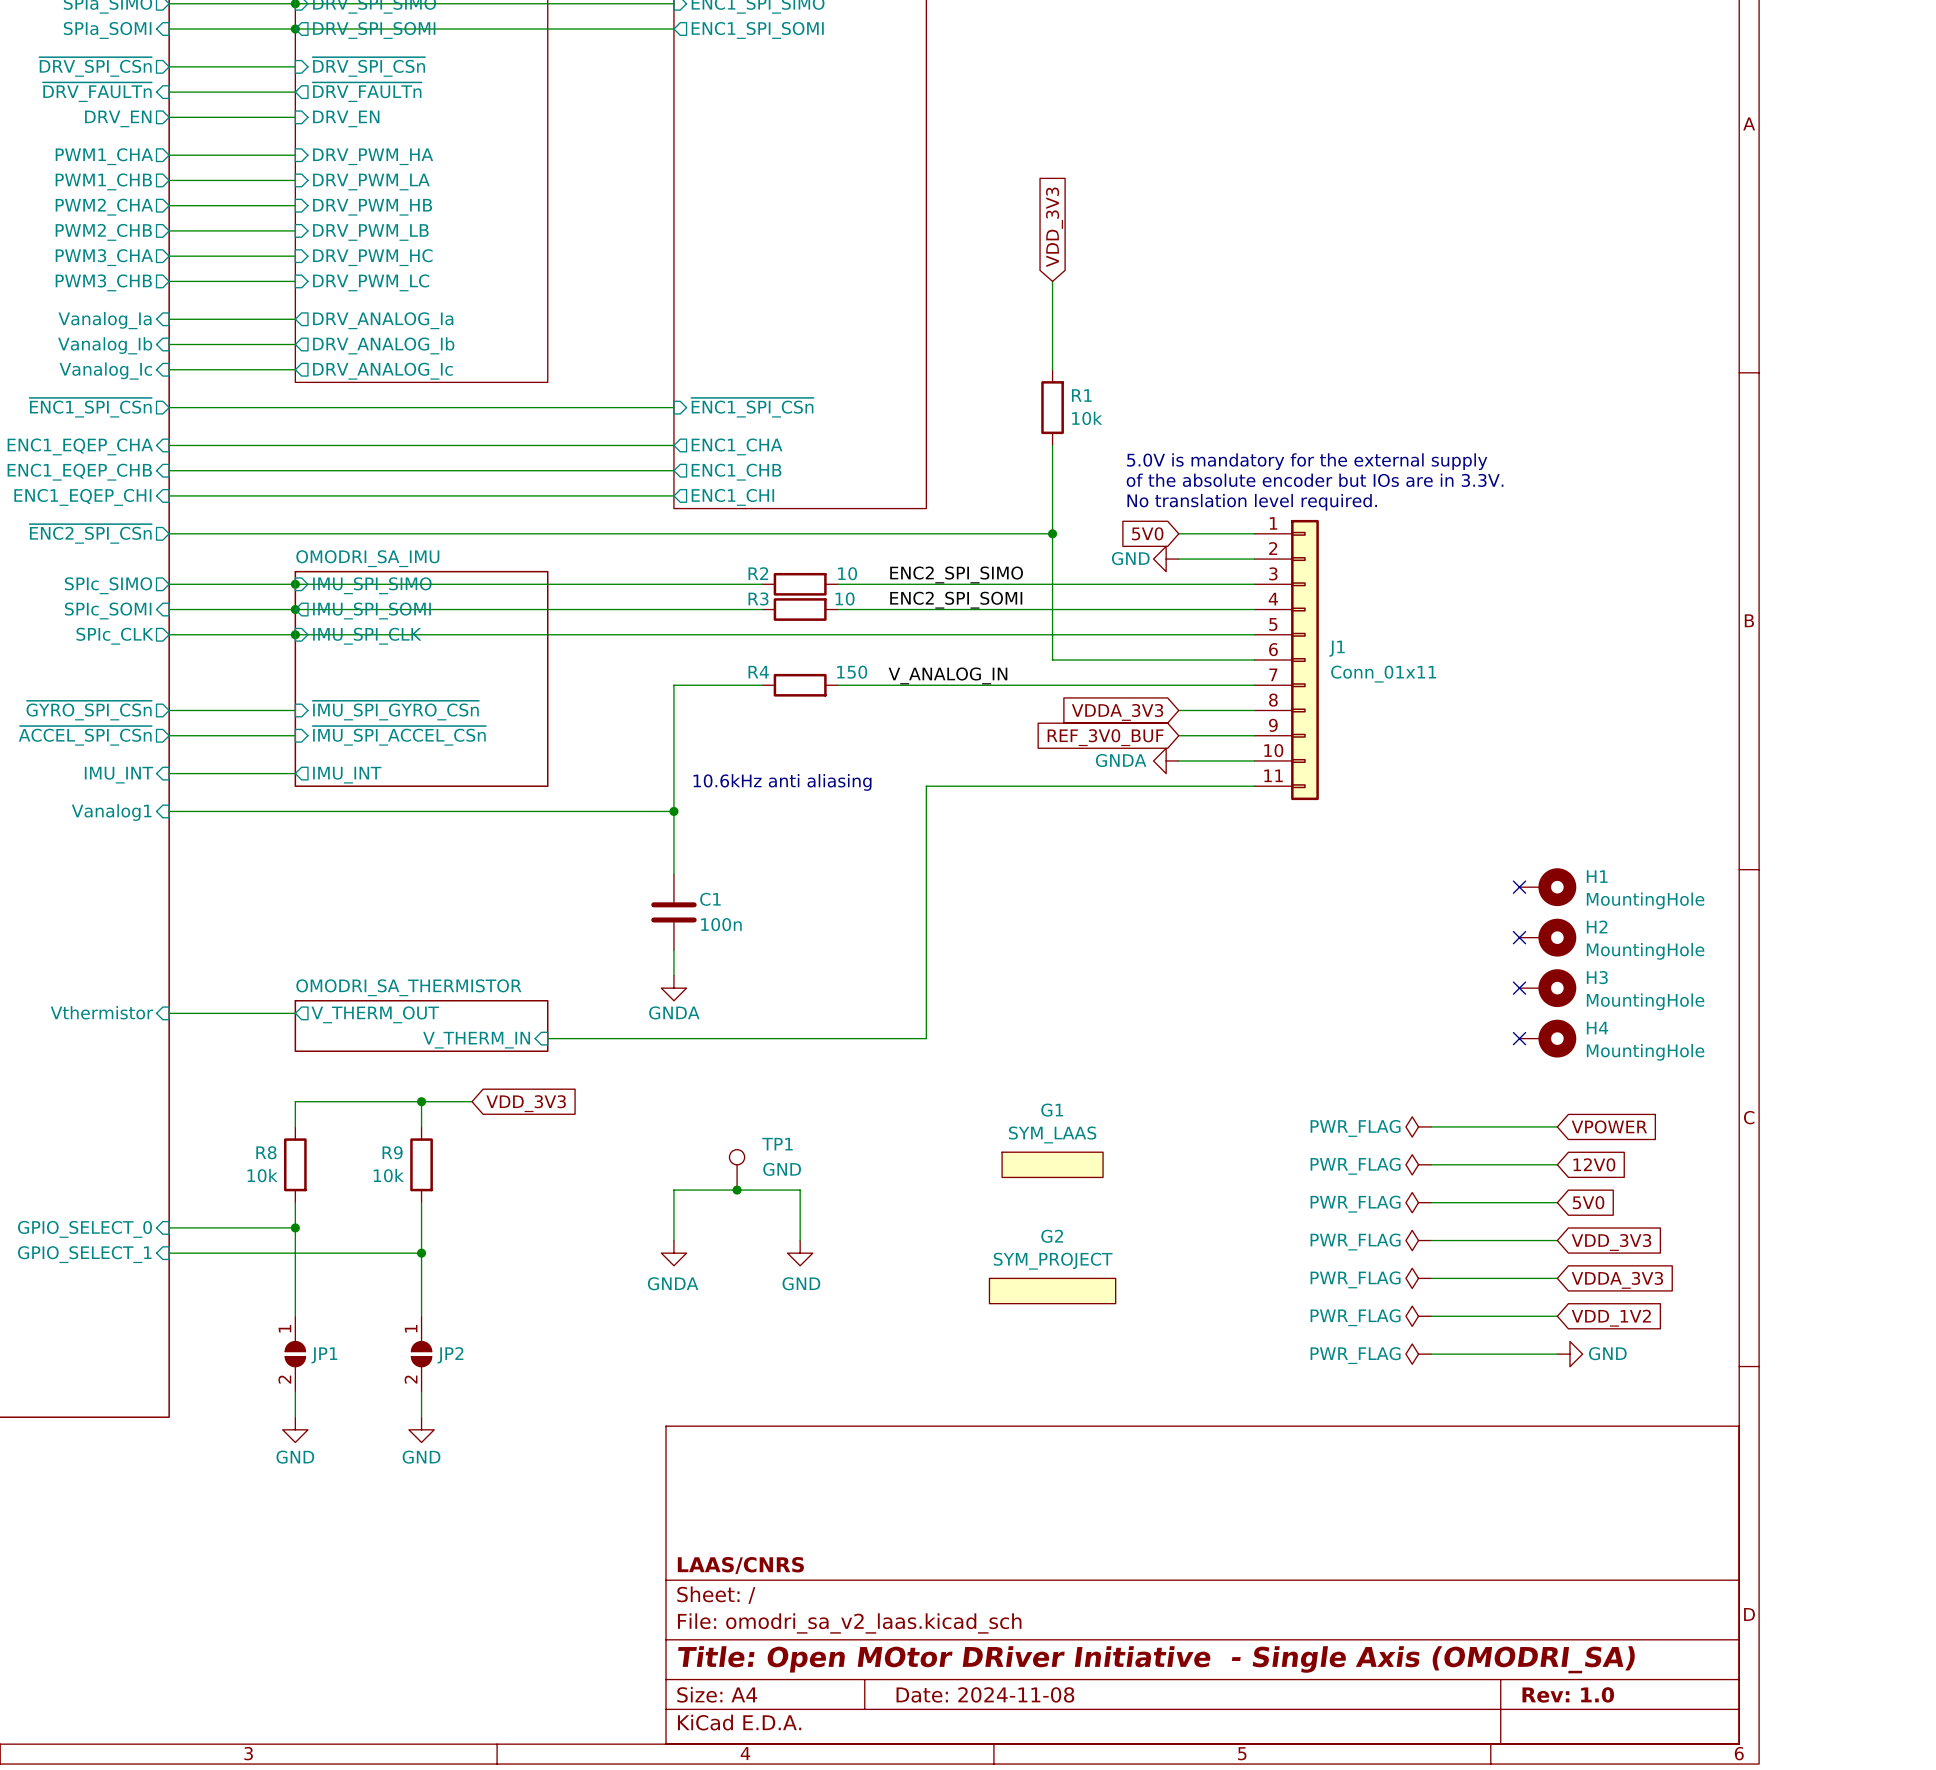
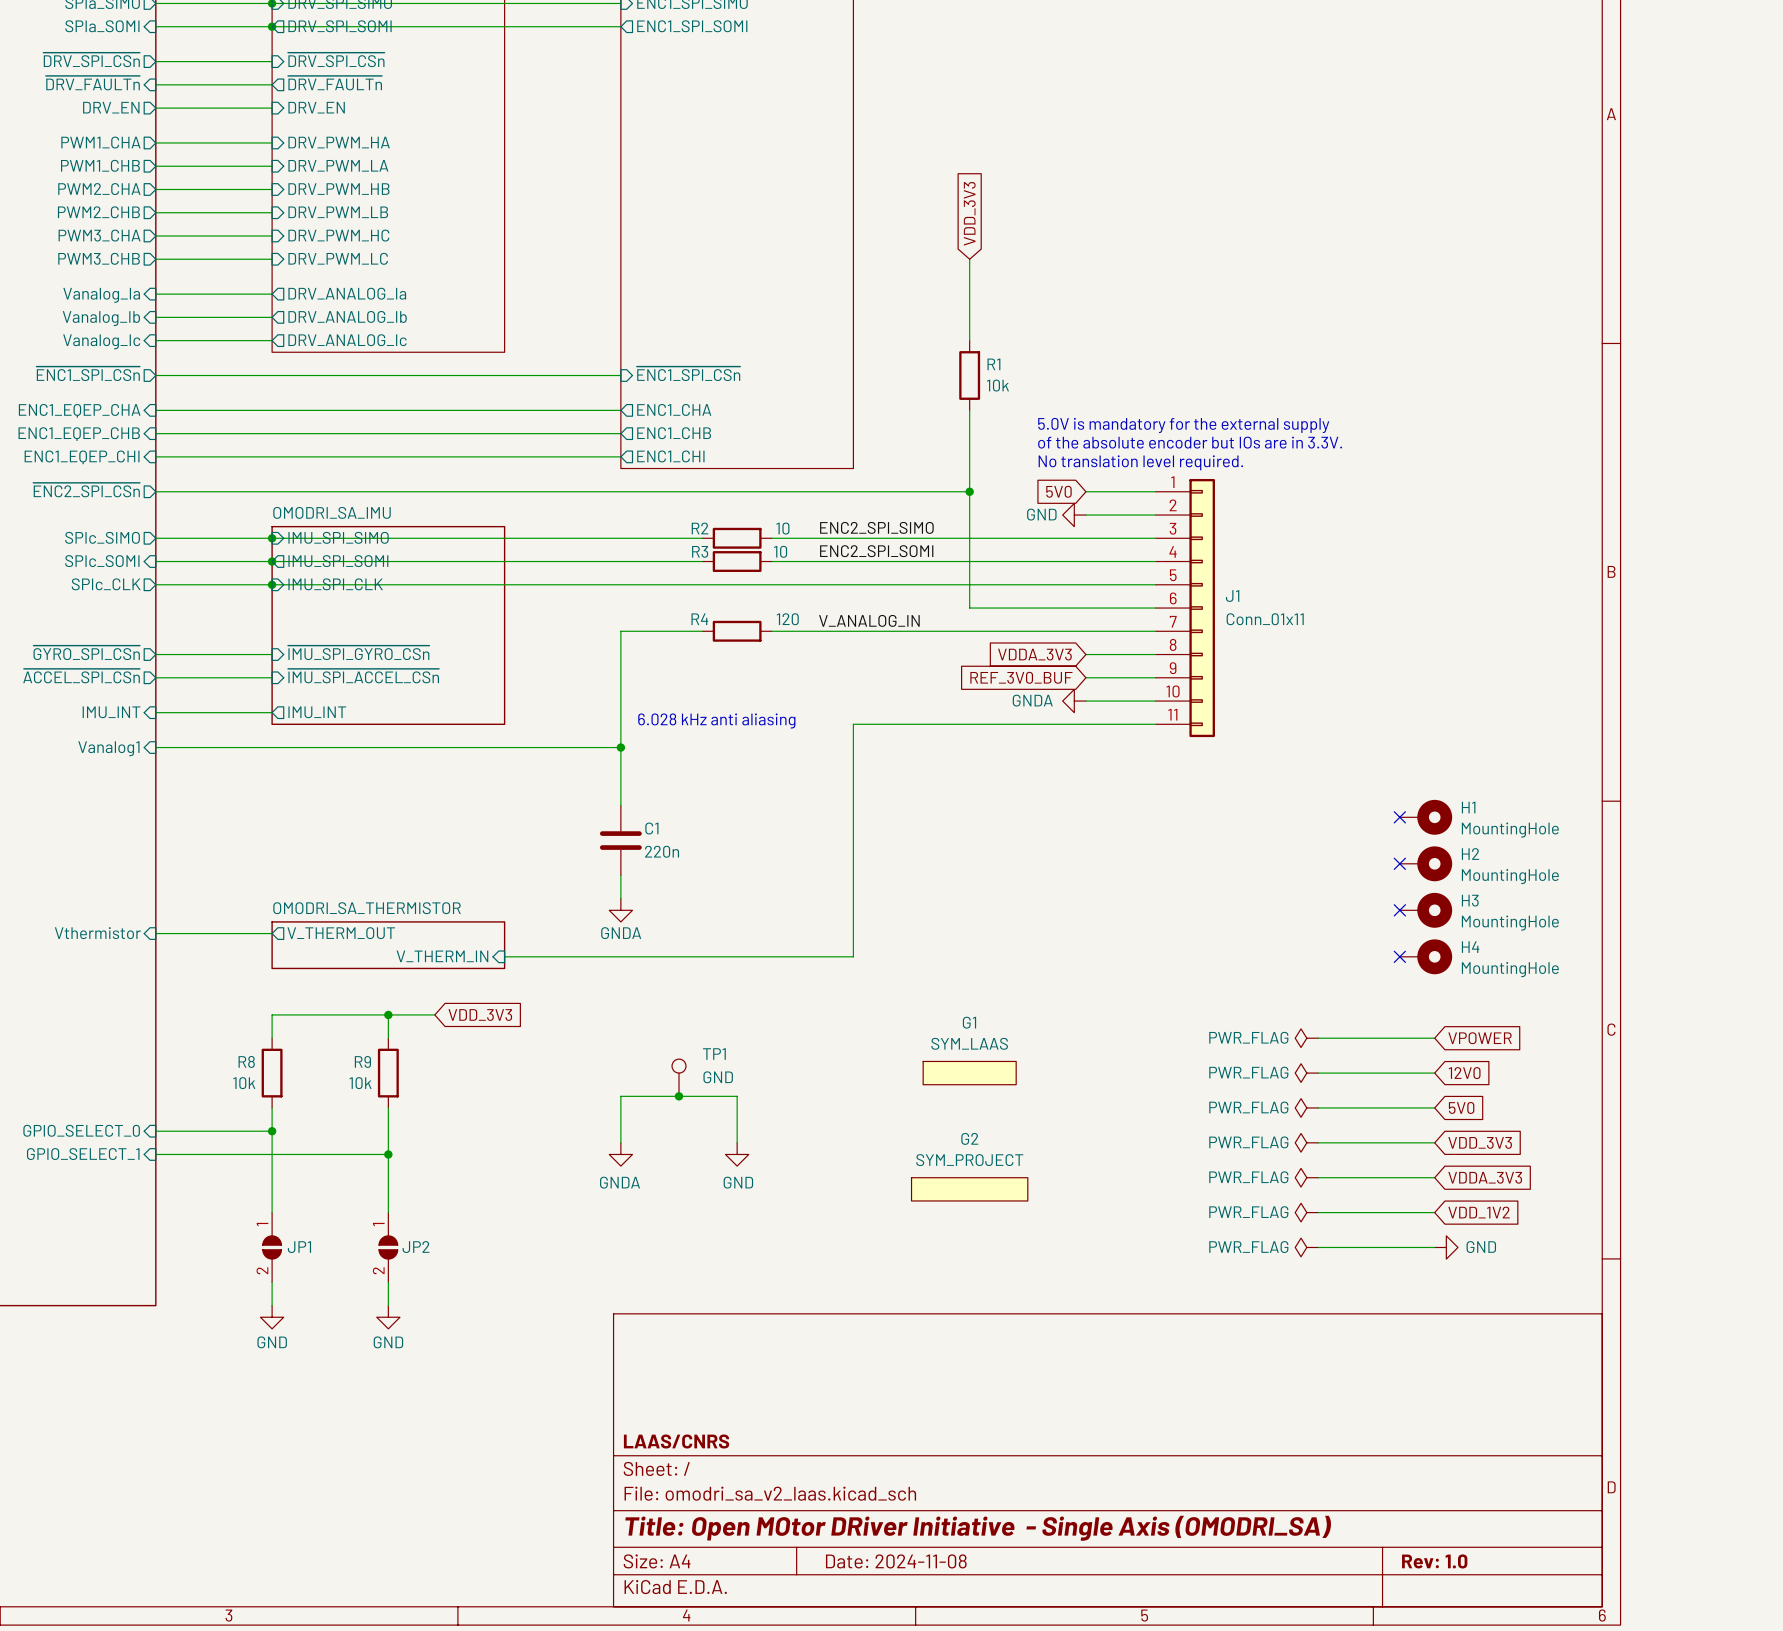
R4 value: 150 (852, 672) -> 120 (787, 619)
text: 10.6kHz anti aliasing (782, 782) -> 6.028 kHz anti aliasing (716, 720)
C1 value: 100n (721, 924) -> 220n (662, 851)

